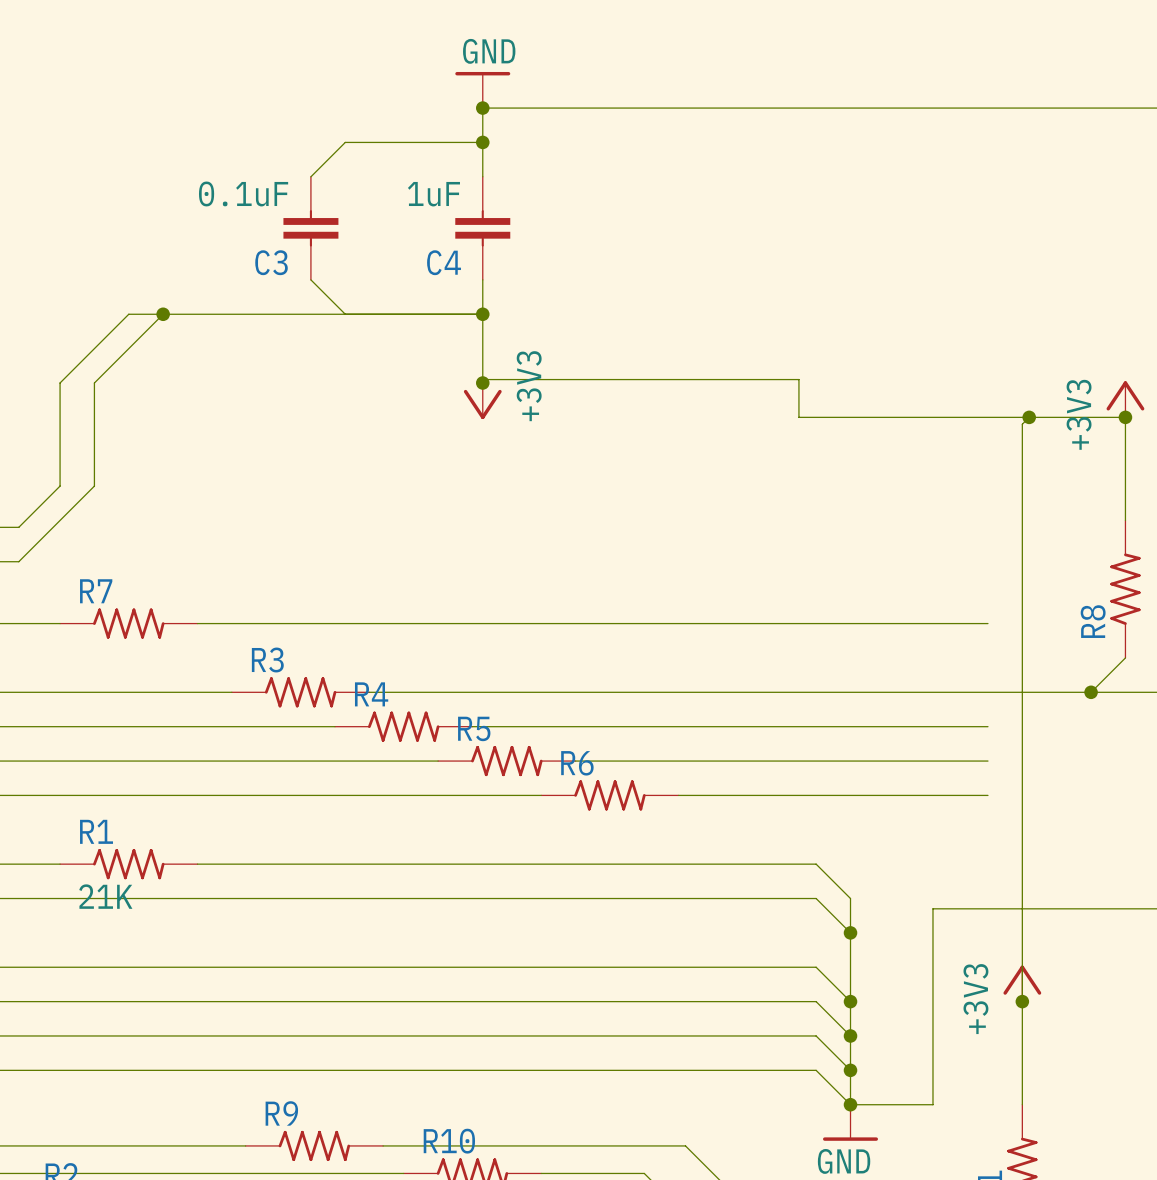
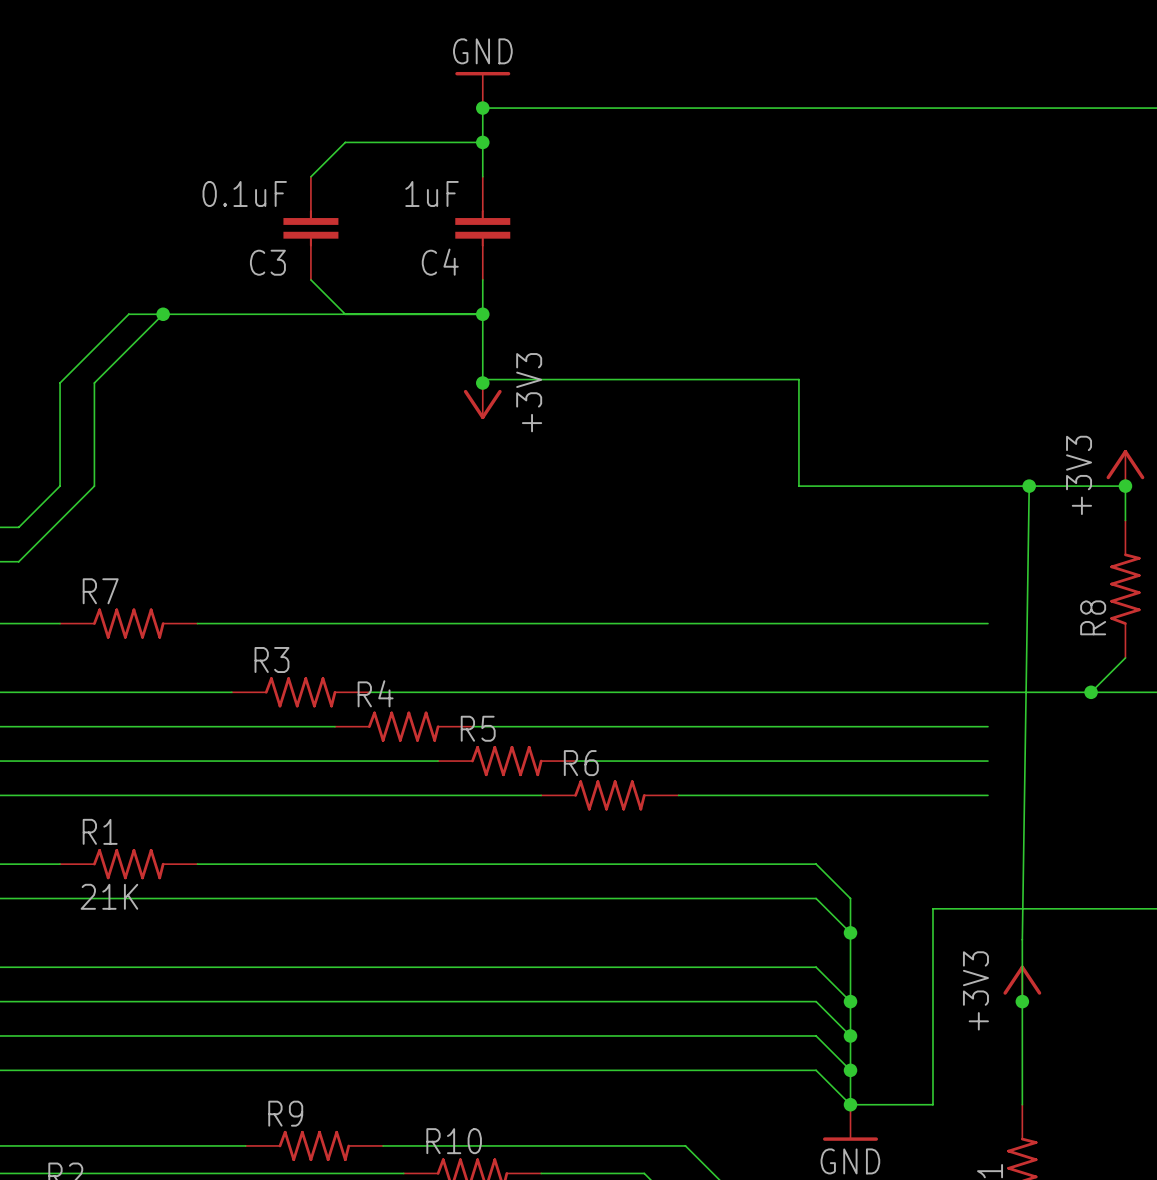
power symbol position: +3V3 (1125, 399) -> +3V3 (1125, 468)
wire: (798, 417) (1125, 417) (1125, 486) -> (798, 417) (798, 486) (1125, 486)
wire: (1029, 417) (1022, 424) (1022, 939) -> (1029, 486) (1022, 939)
junction: (1029, 417) -> none
junction: (1125, 417) -> none
junction: none -> (1029, 486)
junction: none -> (1125, 486)

